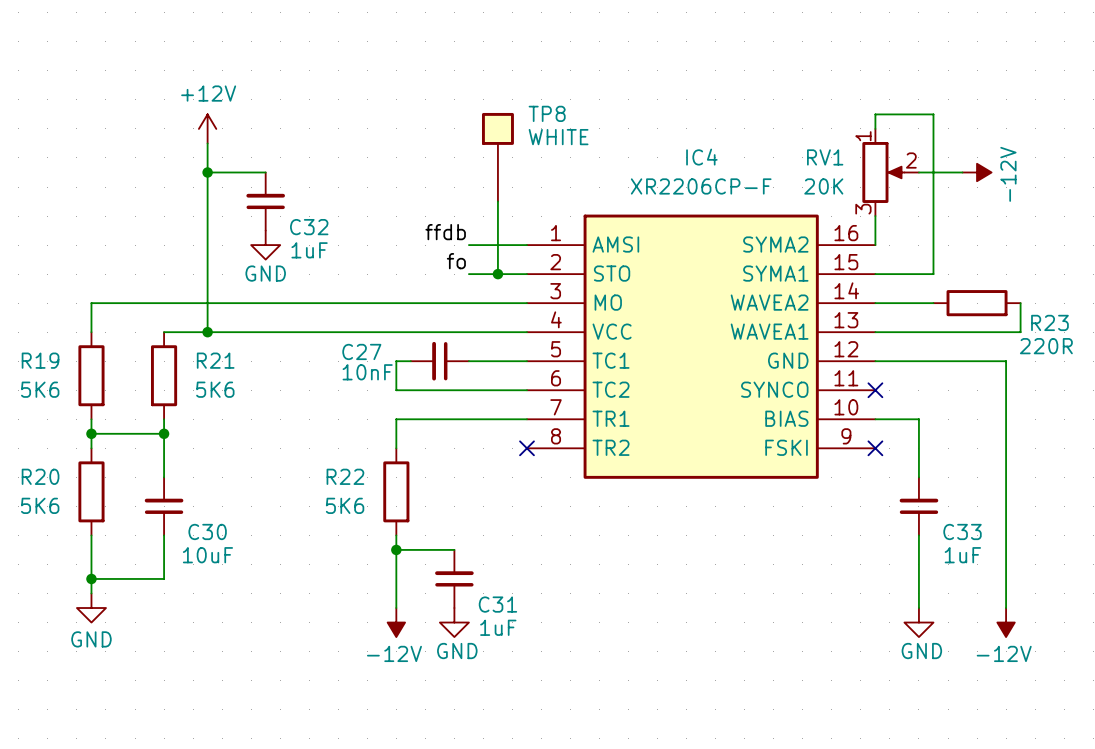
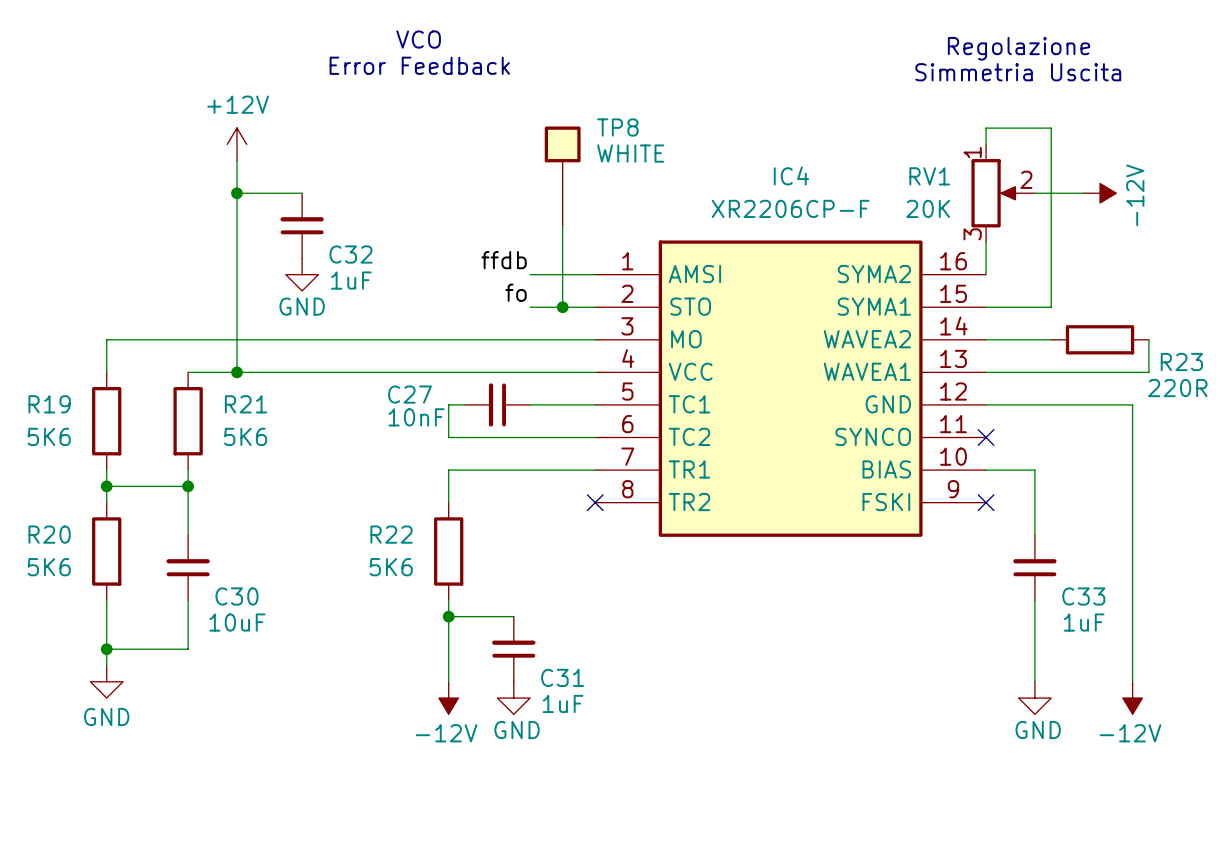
text: none -> VCO (418, 39)
text: none -> Regolazione (1019, 48)
text: none -> Error Feedback (419, 65)
text: none -> Simmetria Uscita (1018, 72)

